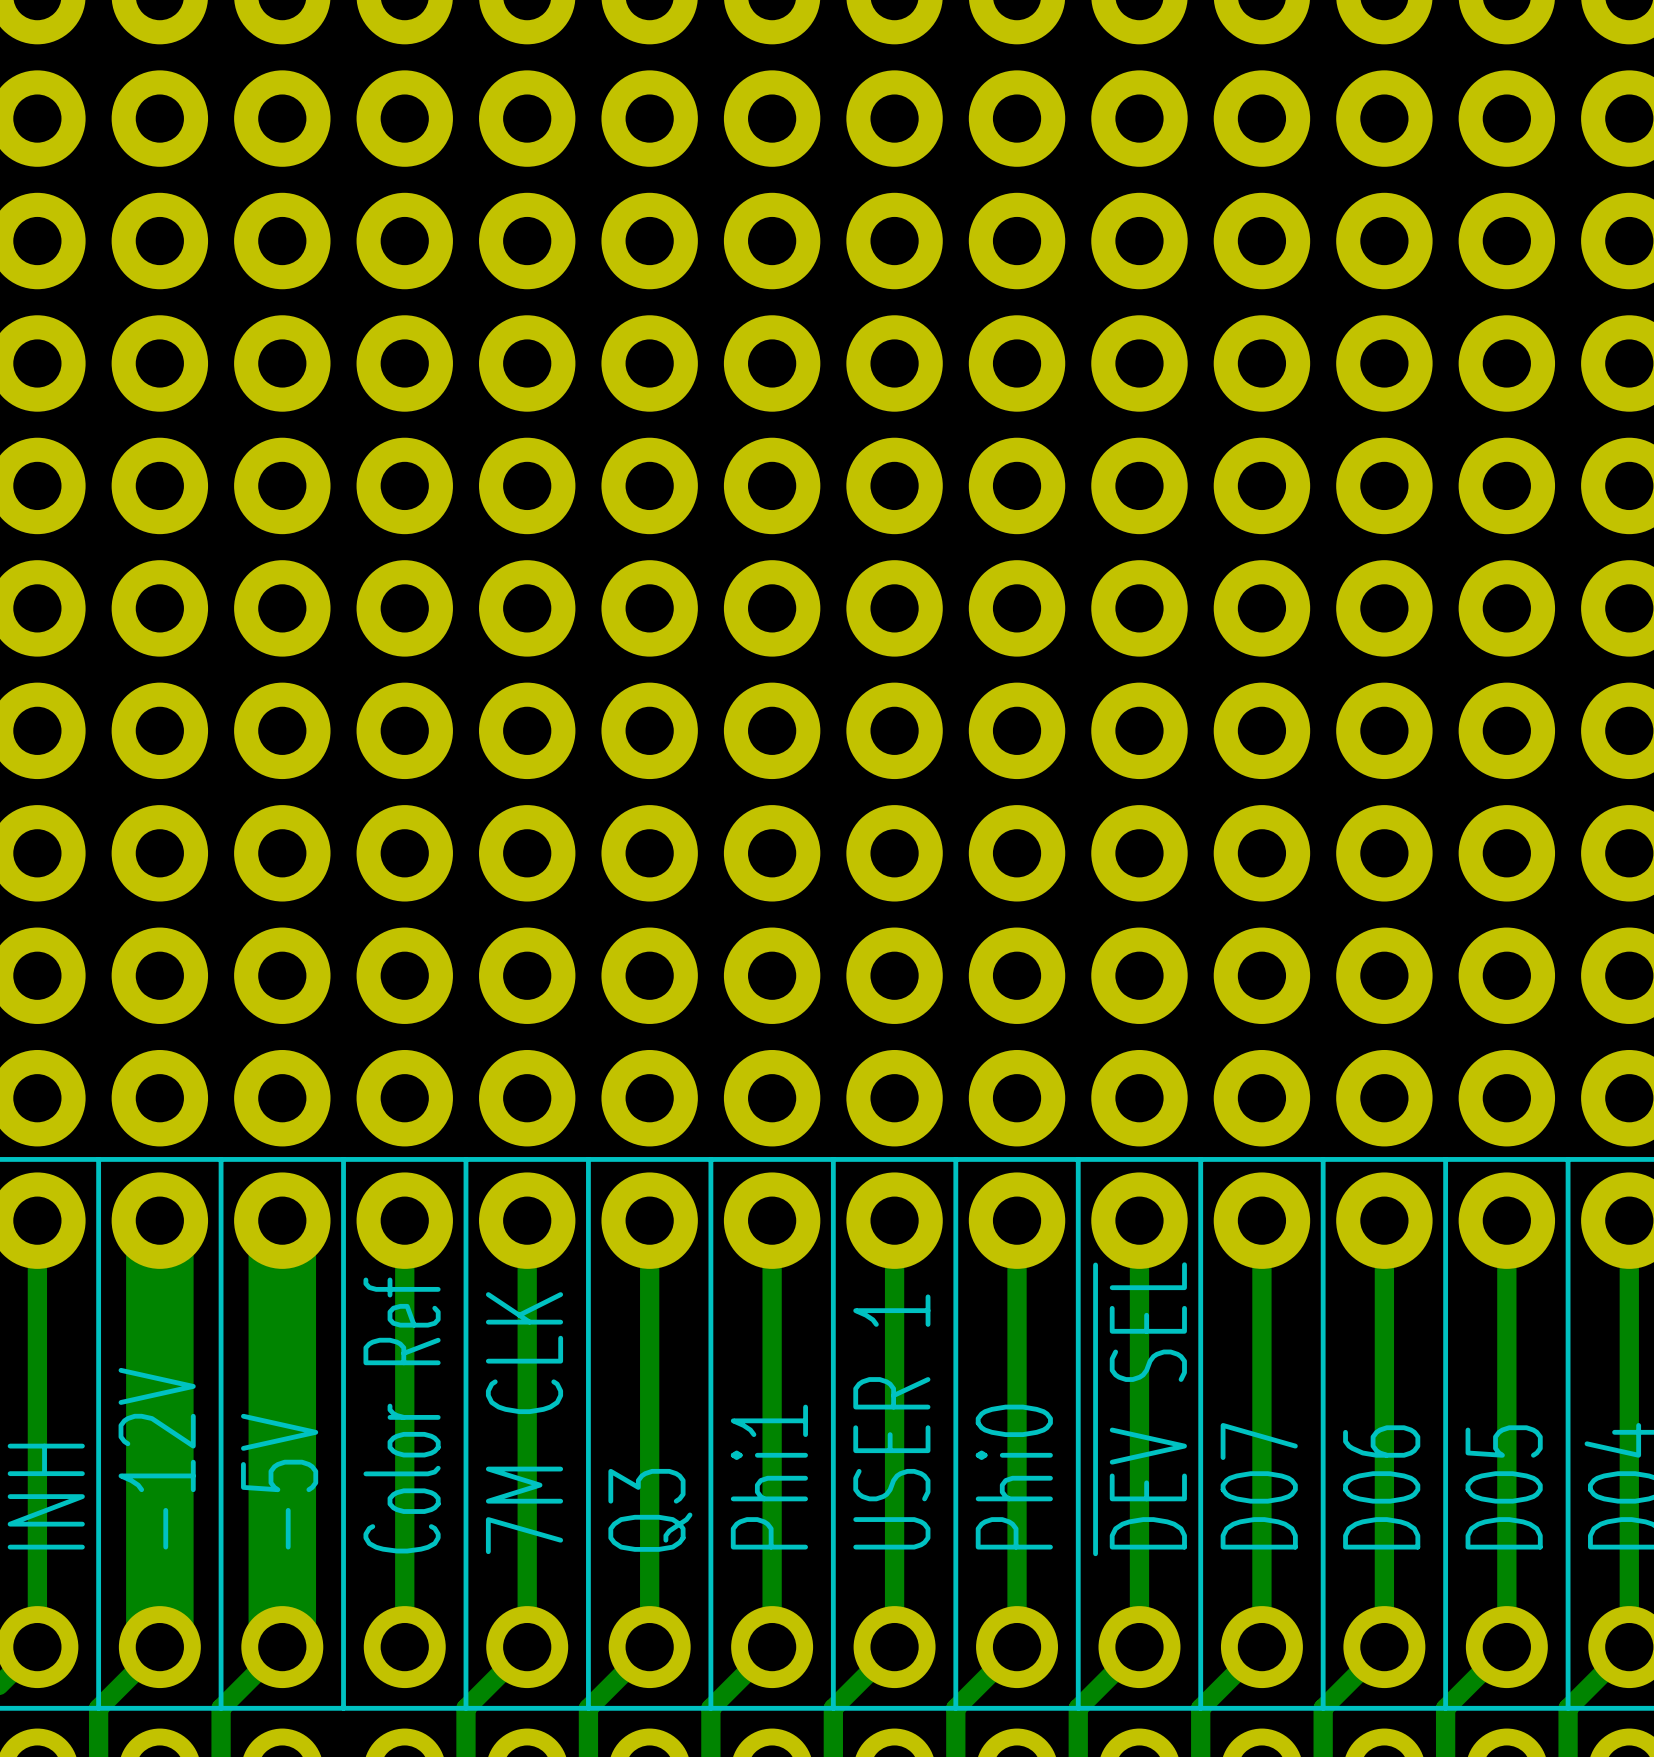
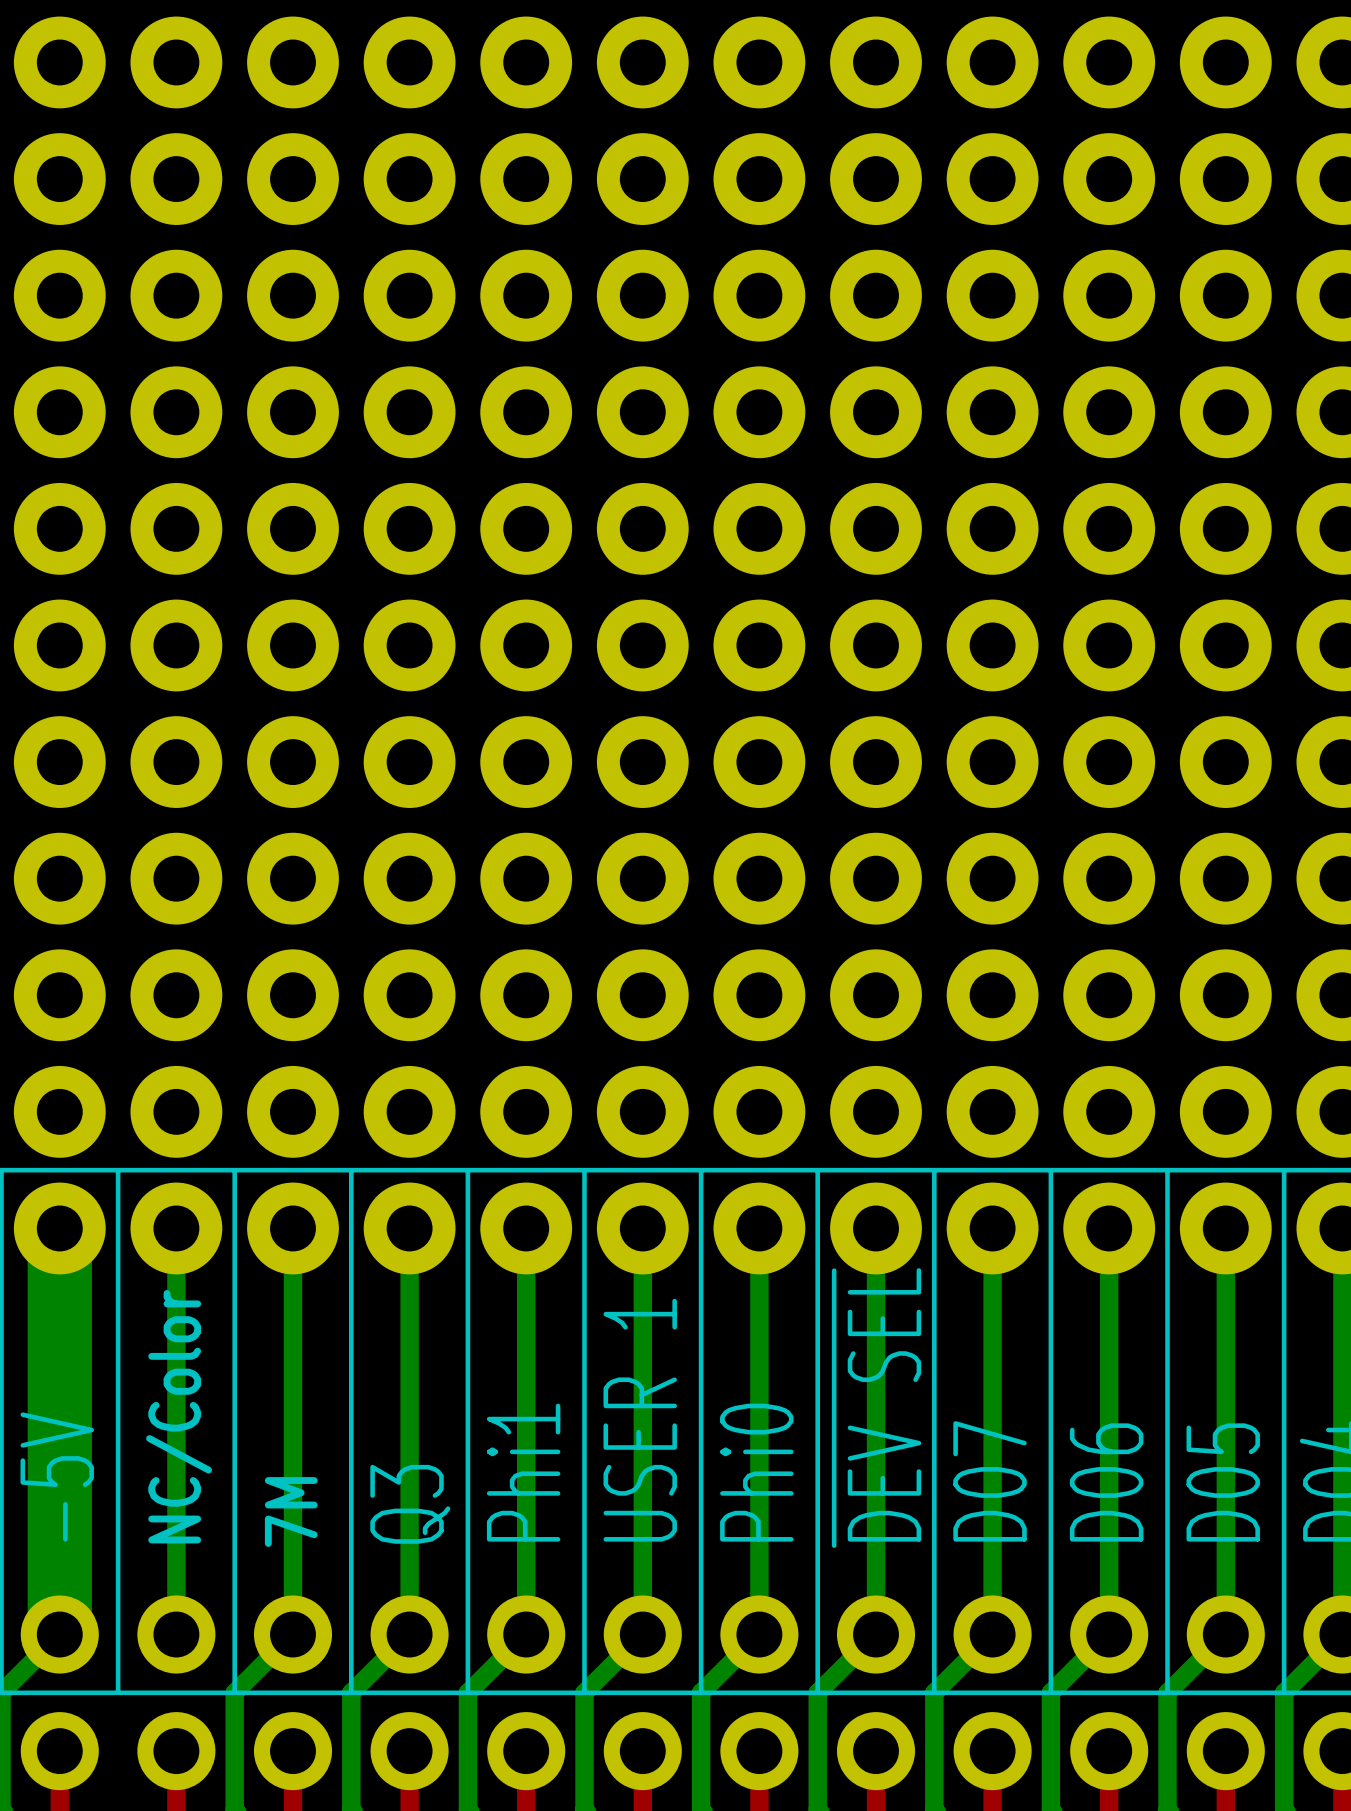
text: Color Ref (402, 1415) -> NC/Color (179, 1416)
text: 7M CLK (524, 1423) -> 7M (291, 1512)

